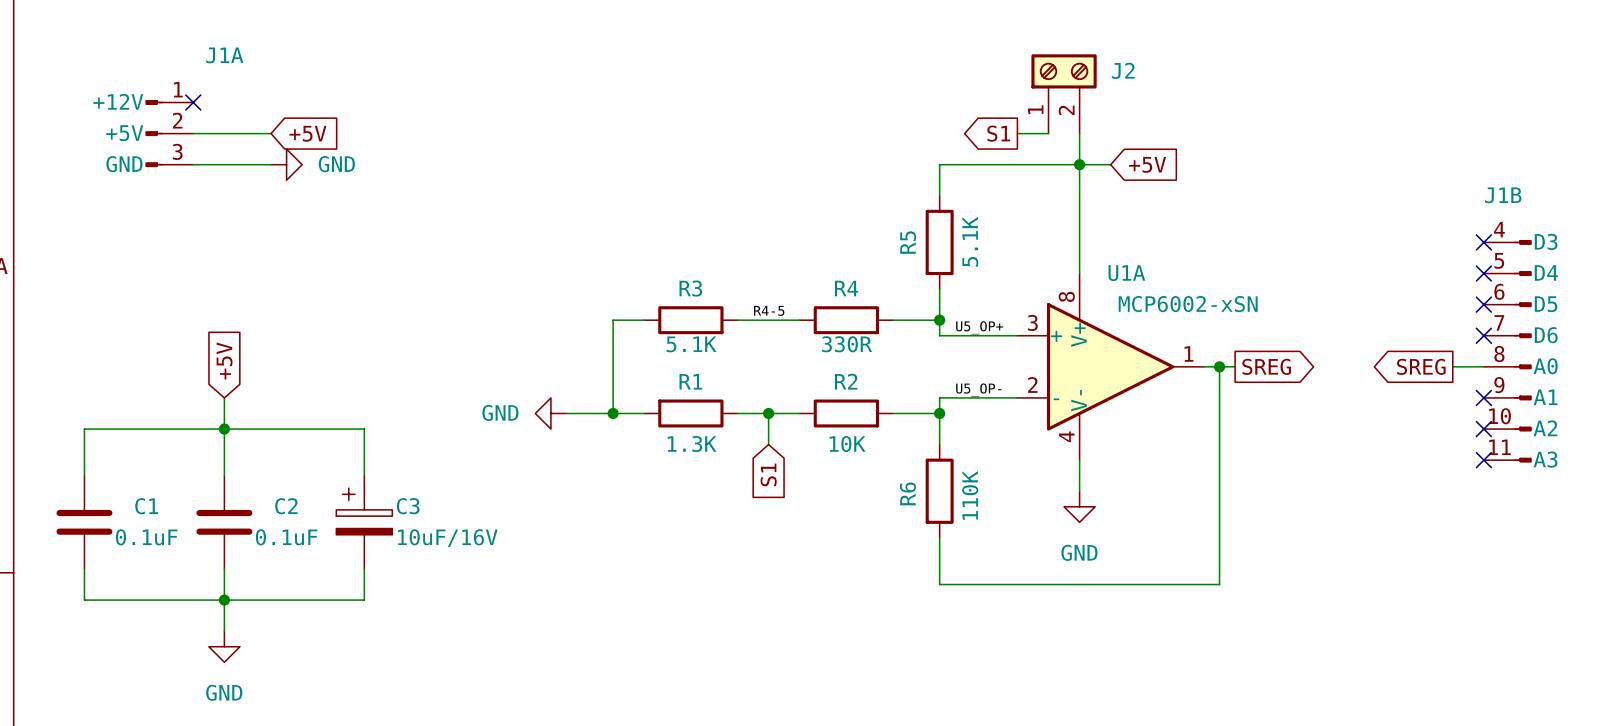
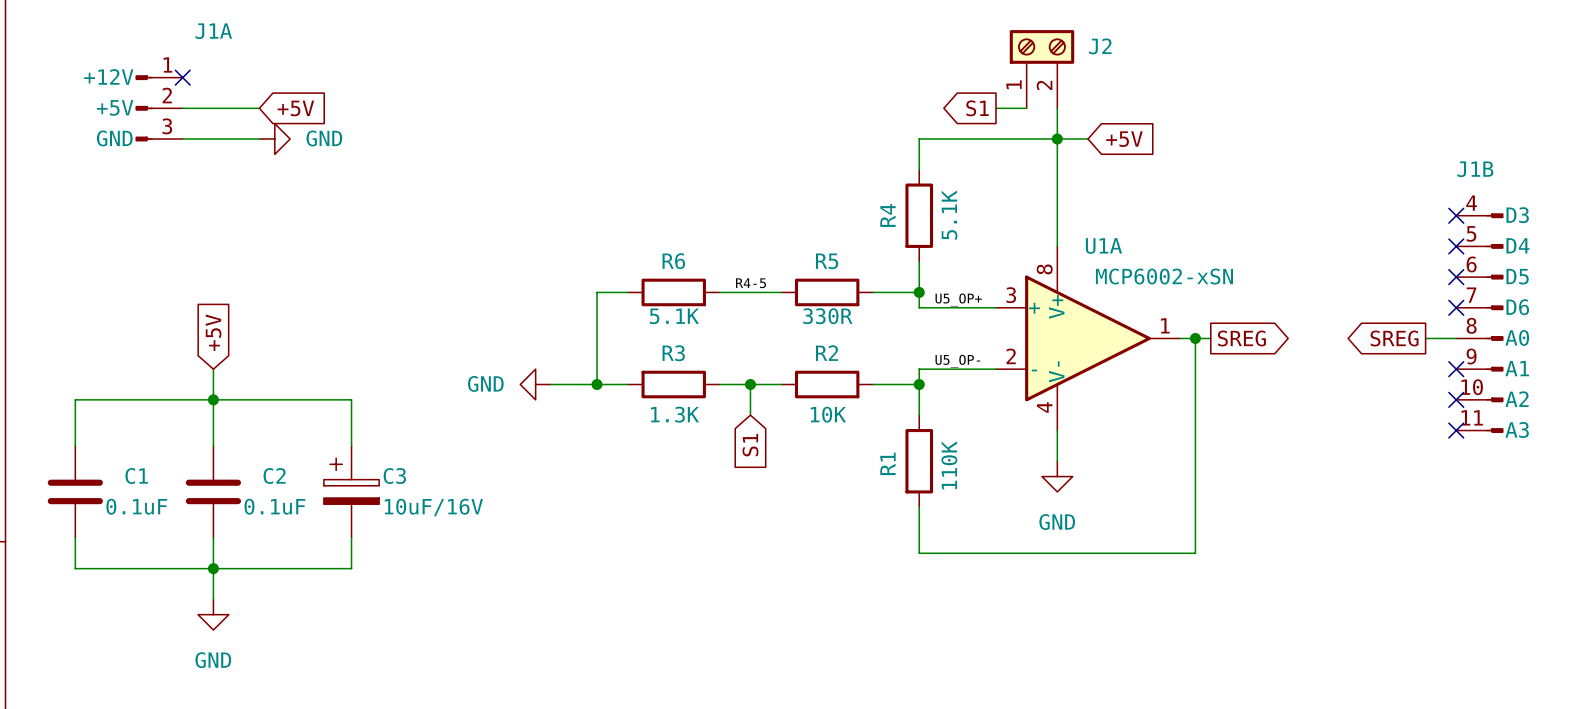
R5 name: R5 (908, 242) -> R4 (887, 215)
R3 name: R3 (690, 288) -> R6 (673, 261)
R4 name: R4 (846, 288) -> R5 (827, 261)
R1 name: R1 (690, 381) -> R3 (673, 353)
R6 name: R6 (907, 493) -> R1 (887, 463)

